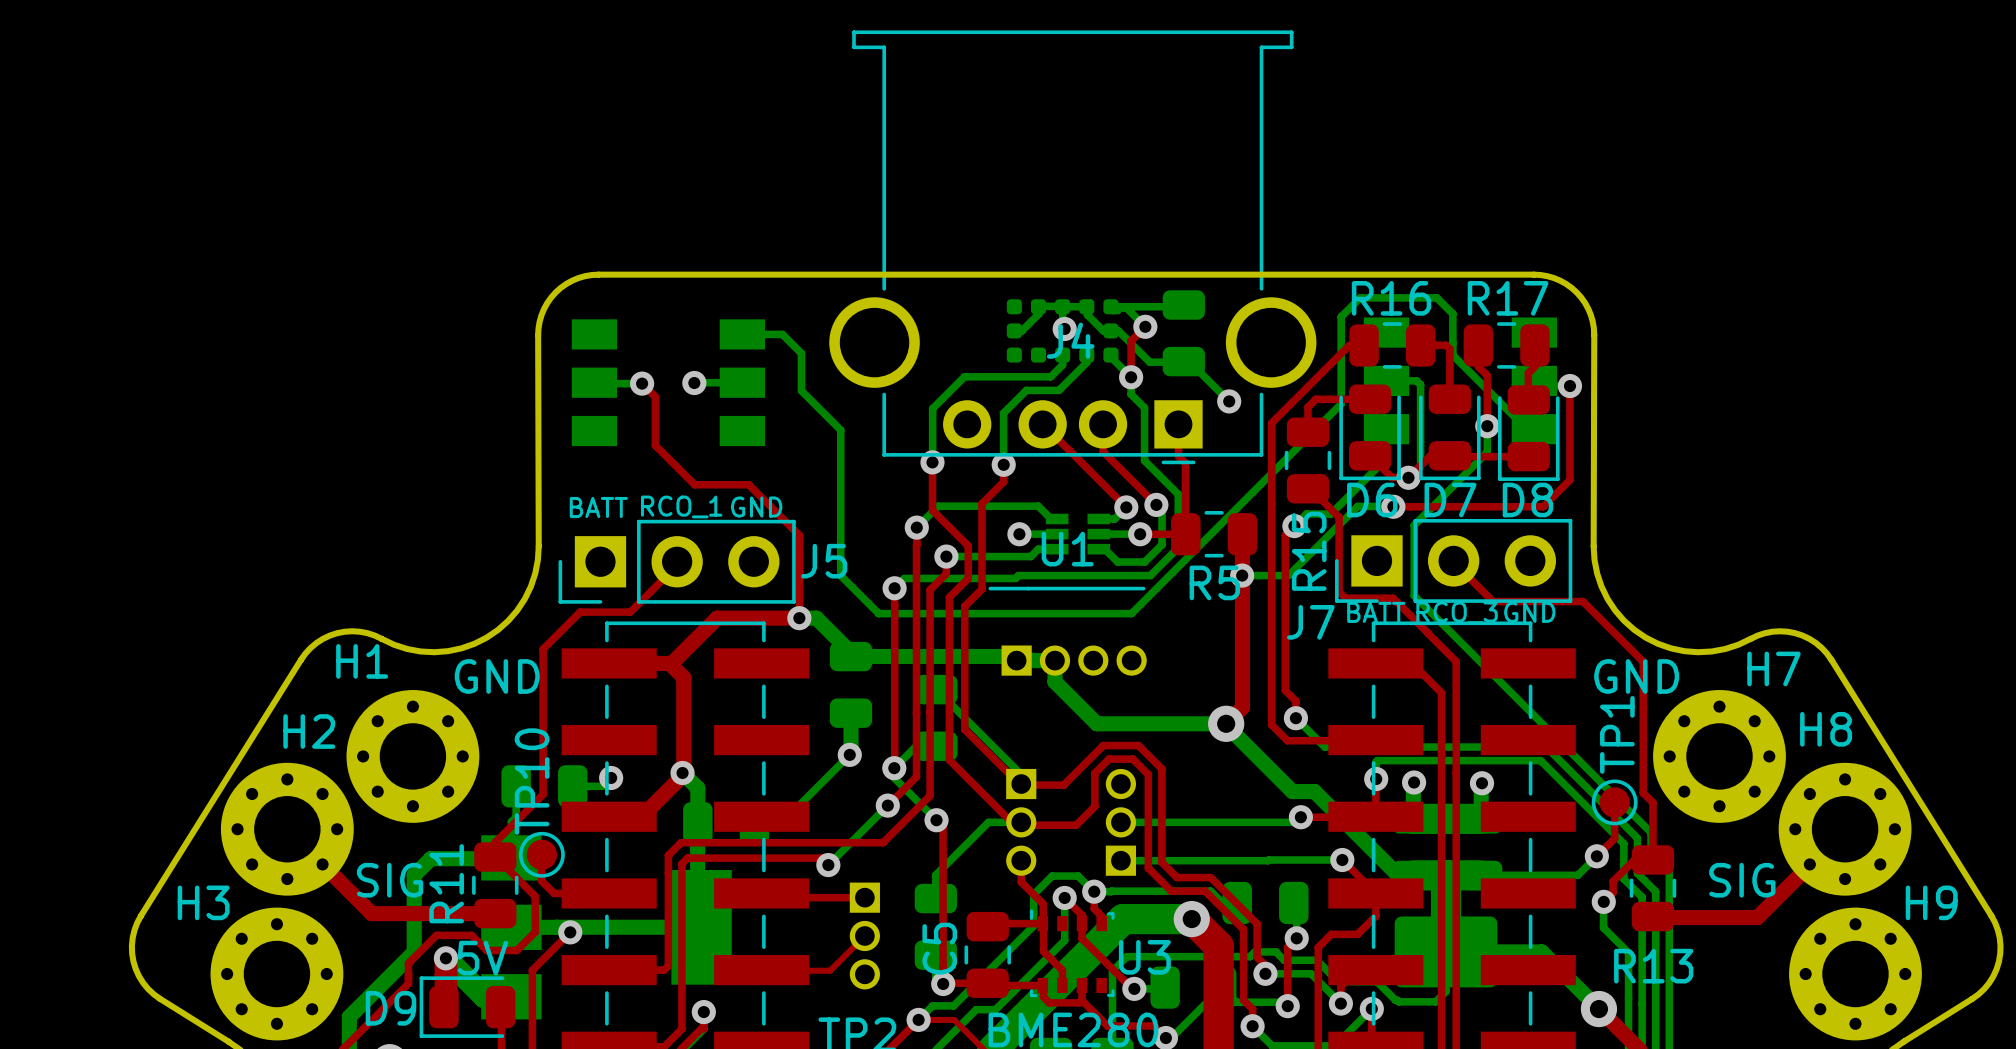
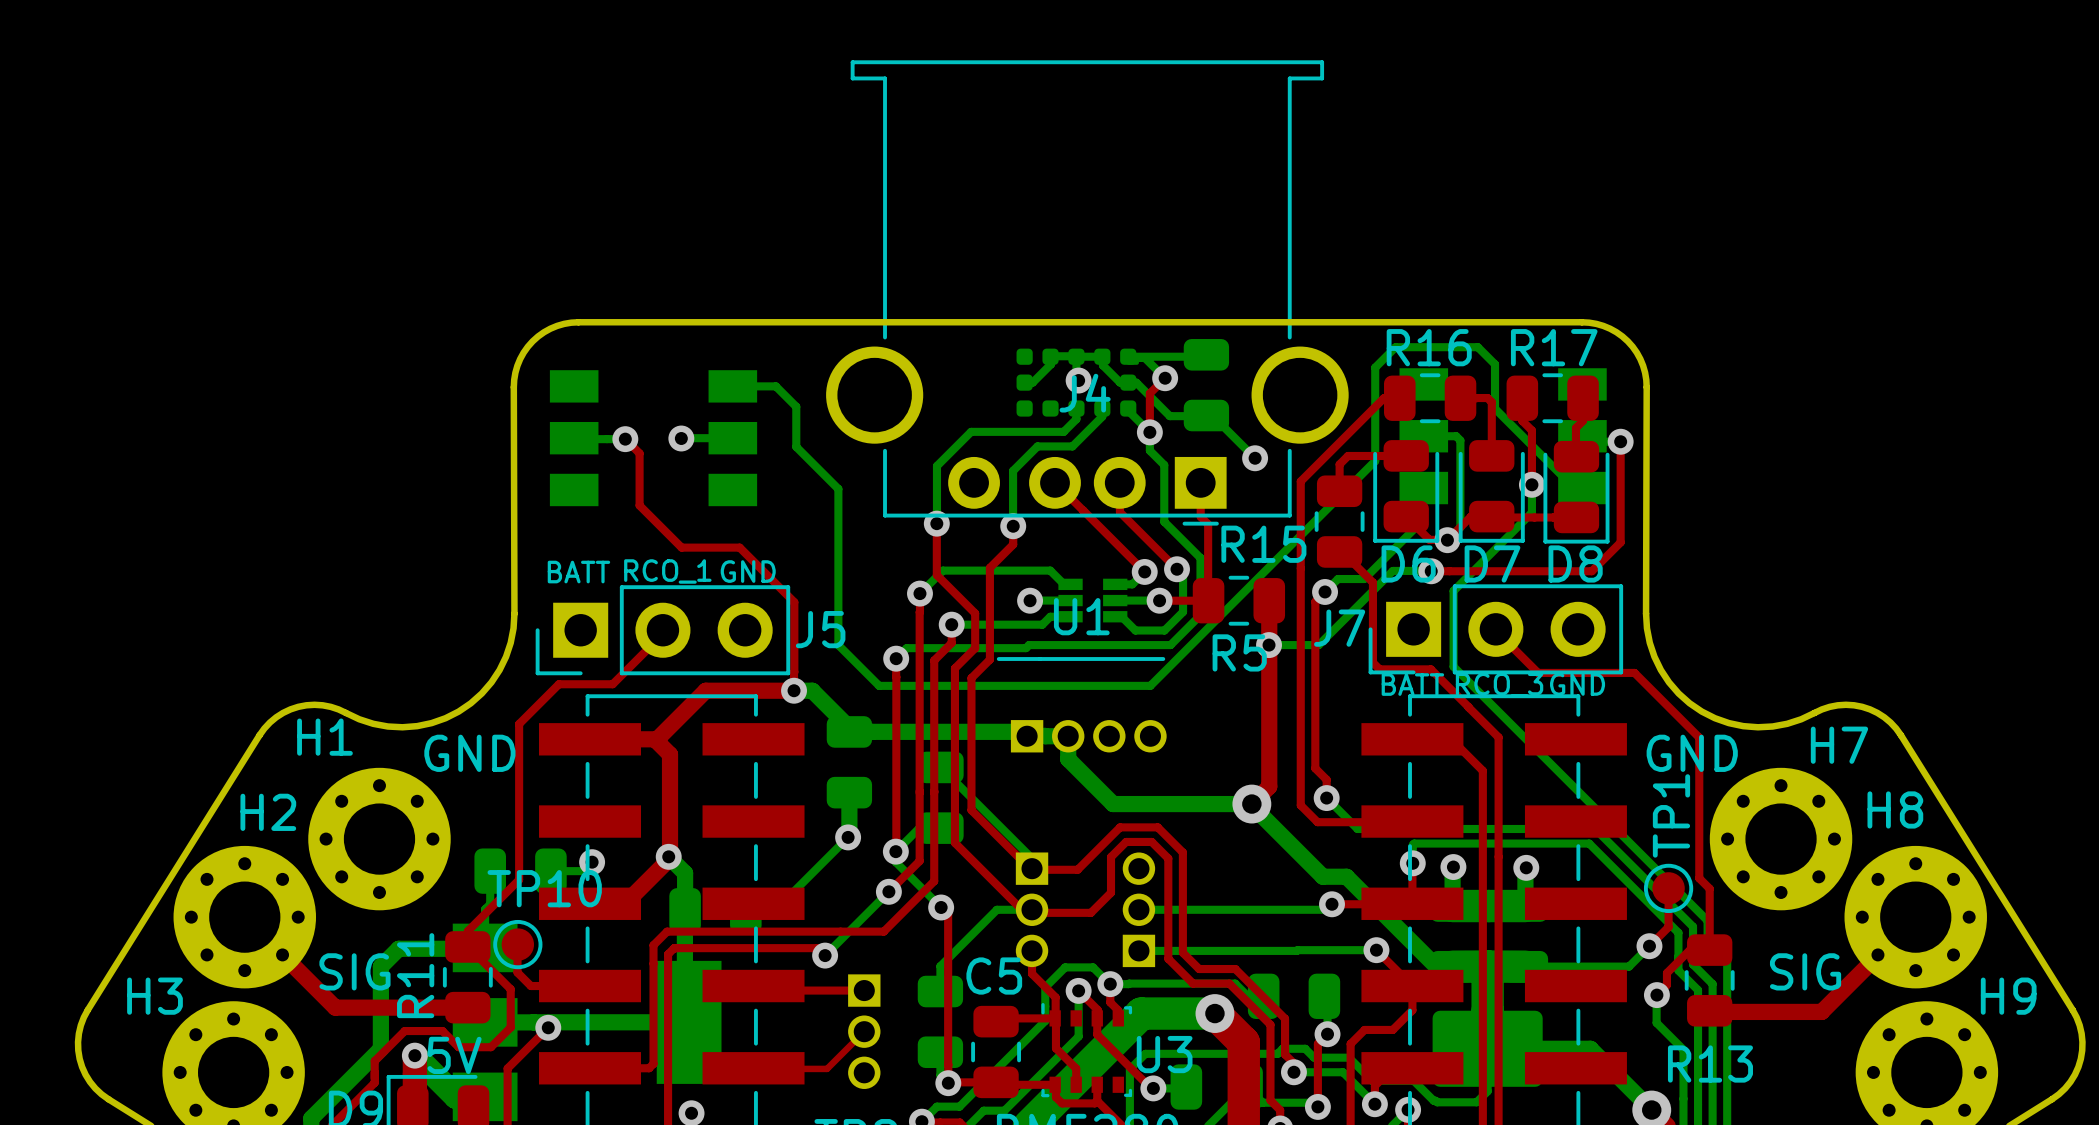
R15 name rotation: 0° (1309, 551) -> 90° clockwise (1263, 544)
J7 name position: J7 (1310, 622) -> J7 (1339, 628)
TP10 name rotation: 0° (532, 781) -> 90° clockwise (544, 888)
C5 name rotation: 0° (939, 948) -> 90° clockwise (994, 976)
C5 name position: C5 (939, 948) -> C5 (994, 976)

